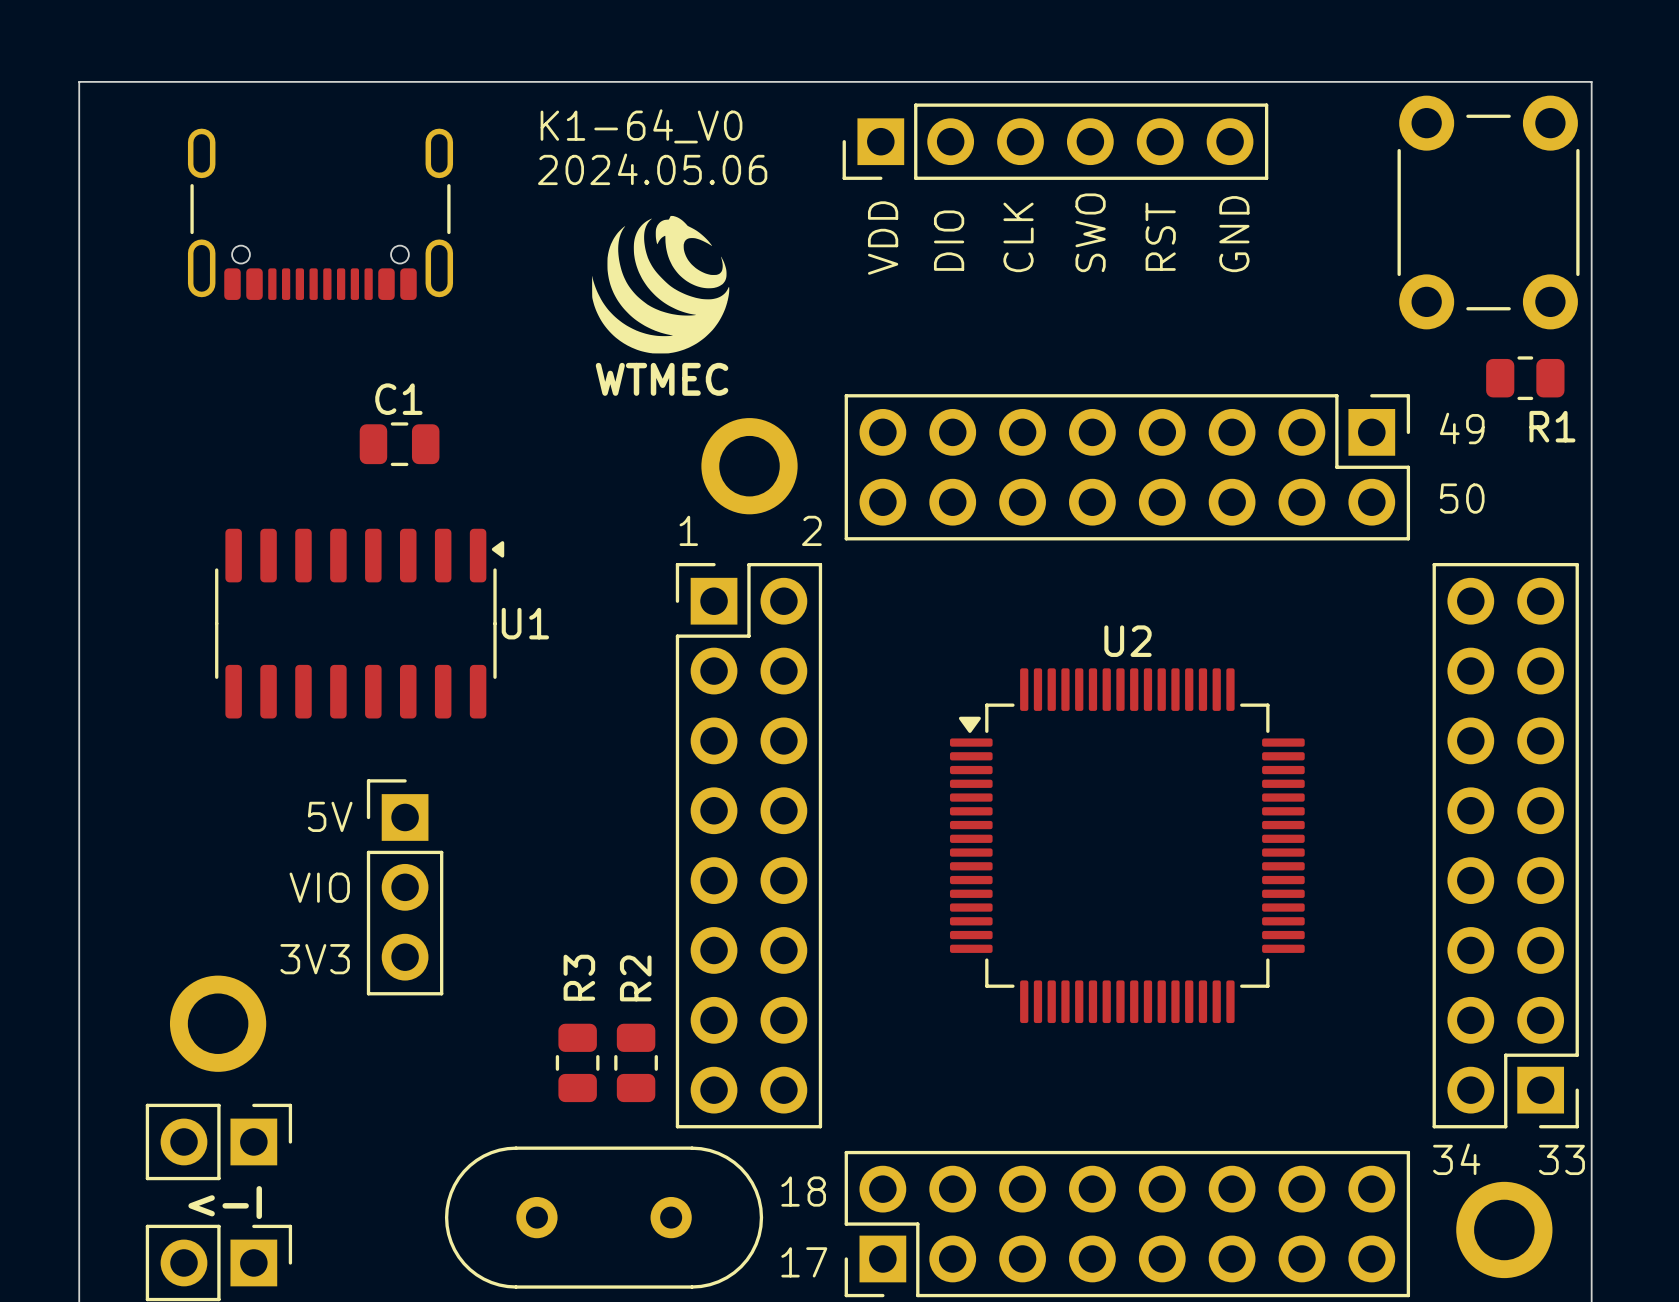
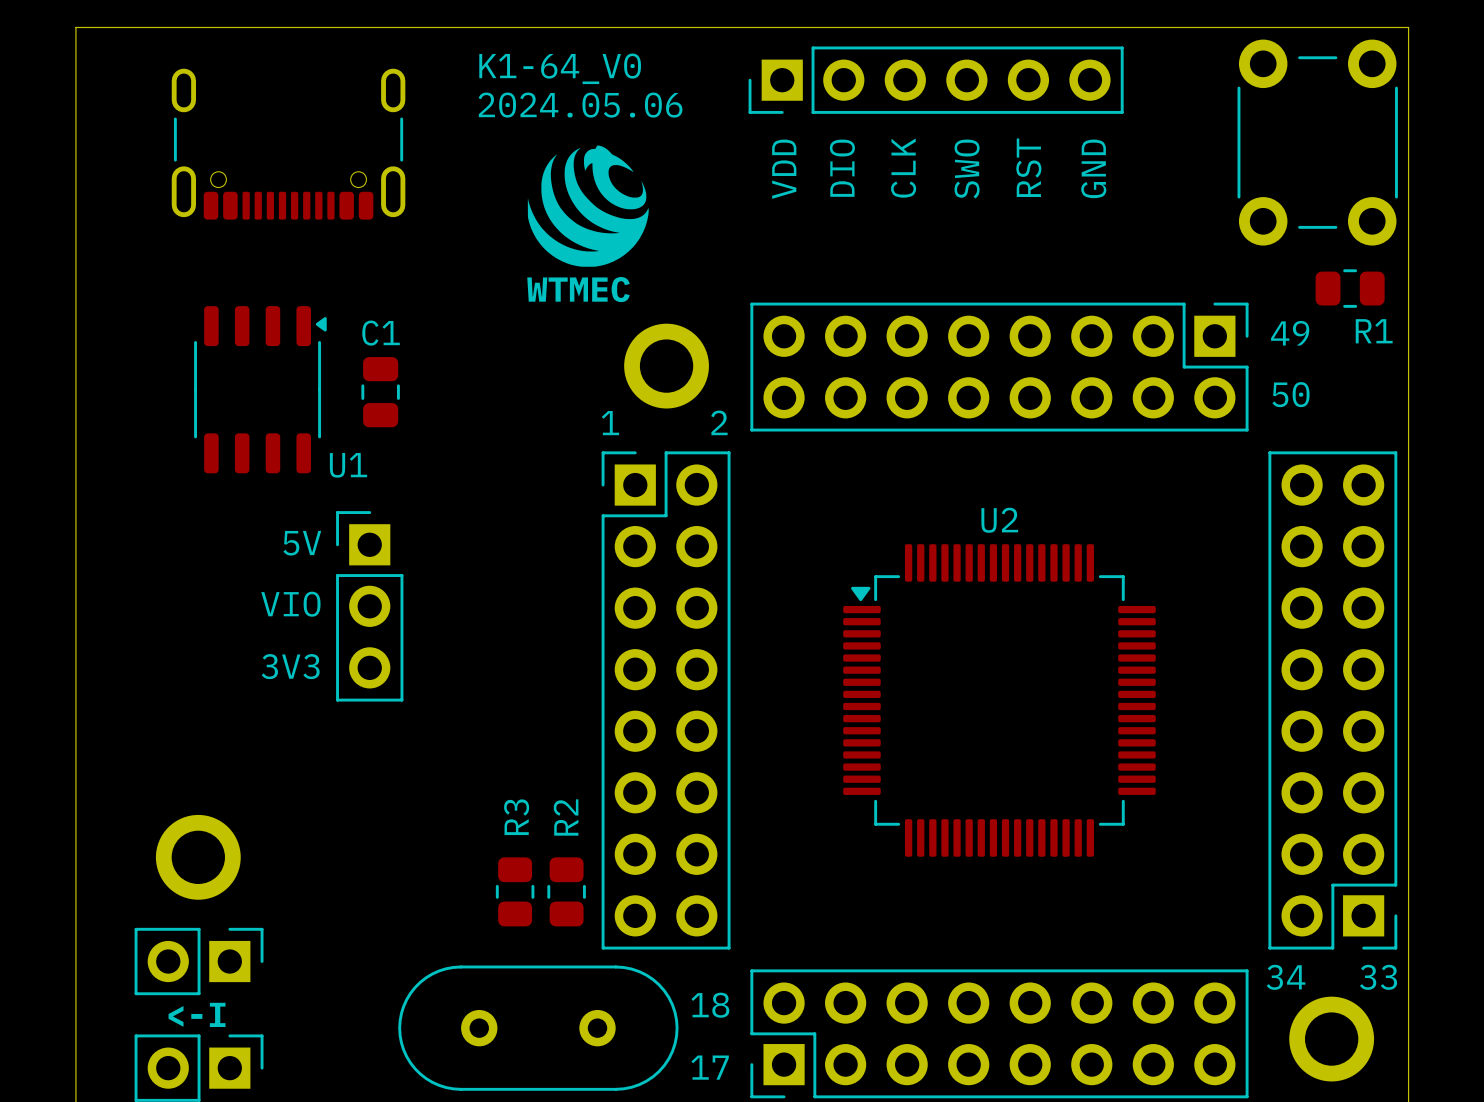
C1 rotation: 0° (399, 444) -> 90° clockwise (380, 392)
C1 position: (399, 444) -> (380, 392)
U1 footprint: [215, 528, 505, 719] -> [194, 306, 327, 474]
U1 name position: U1 (525, 623) -> U1 (348, 465)
text position: 5V (330, 816) -> 5V (302, 543)
text position: VIO (319, 887) -> VIO (290, 604)
part position: (405, 887) -> (369, 606)
text position: 3V3 (315, 959) -> 3V3 (290, 666)

